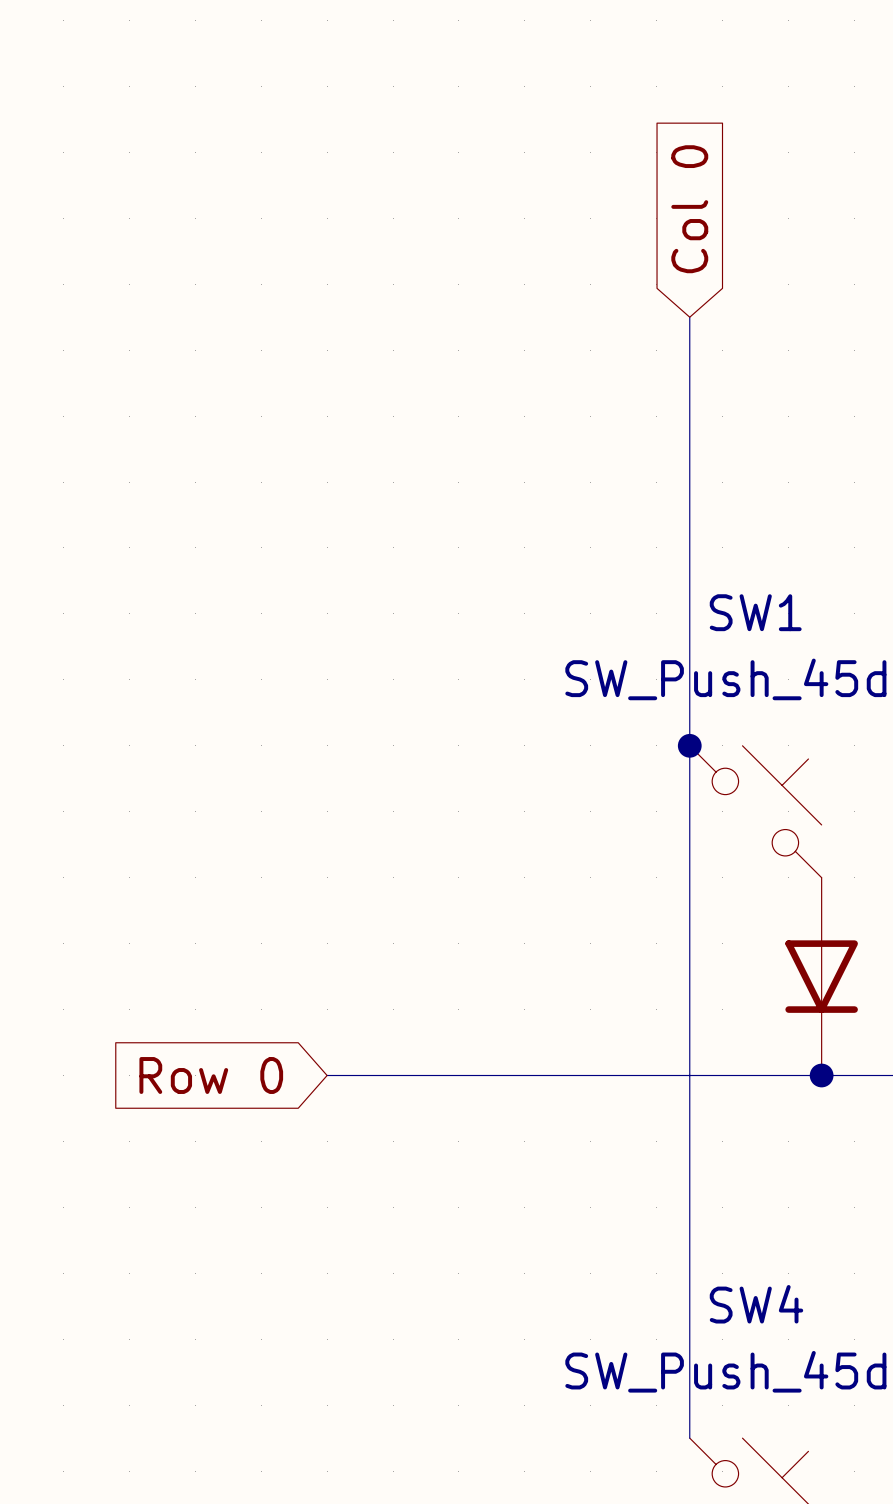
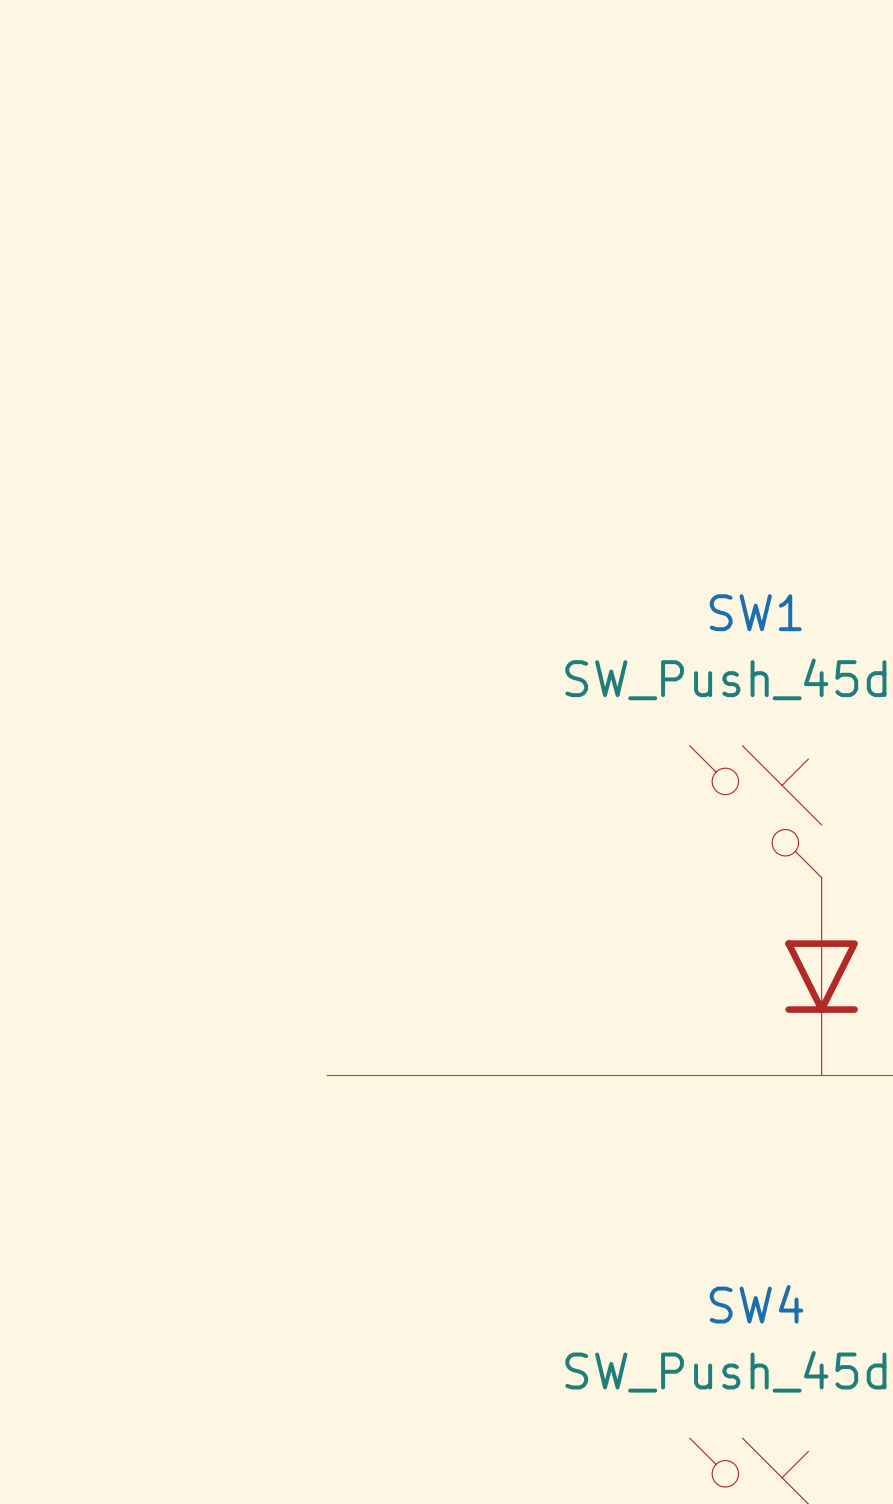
global label: Col 0 (689, 209) -> none
wire: (689, 317) (689, 1438) -> none
junction: (689, 745) -> none
global label: Row 0 (211, 1075) -> none
junction: (821, 1075) -> none

